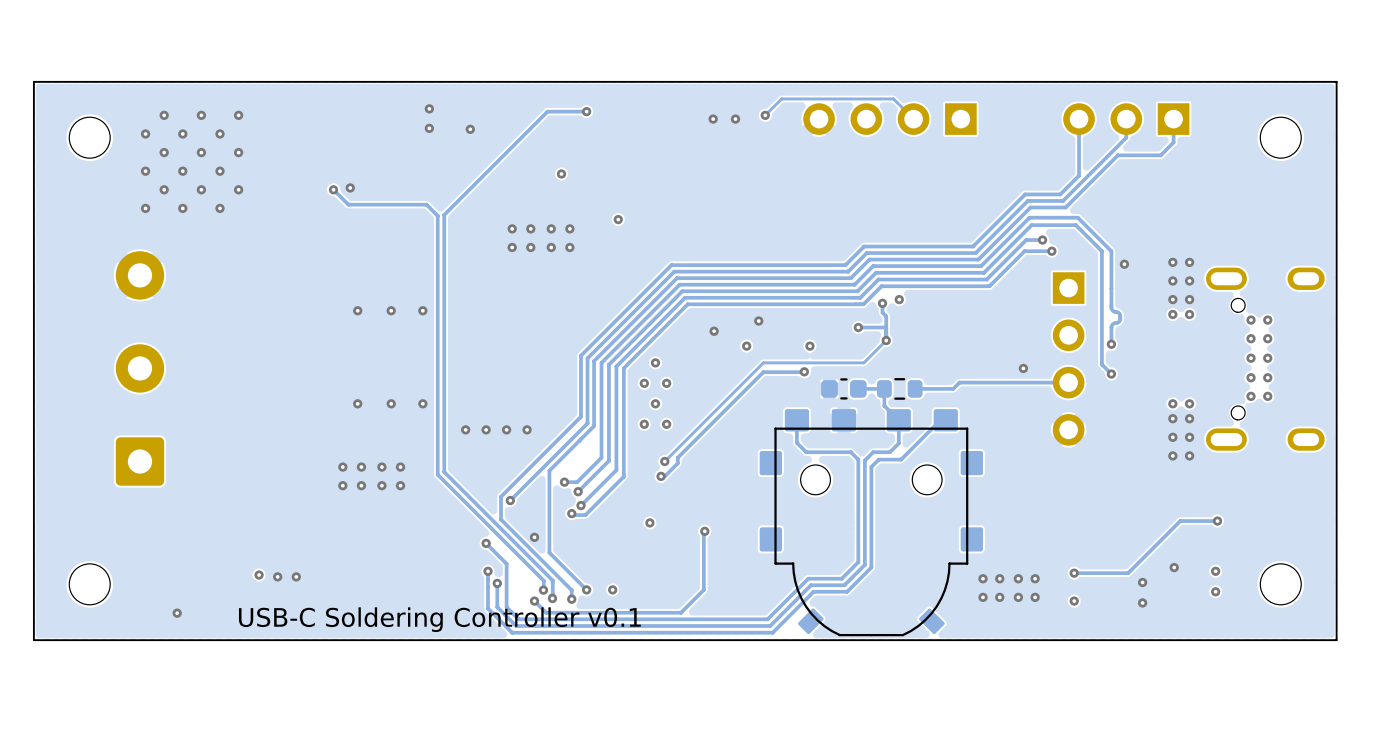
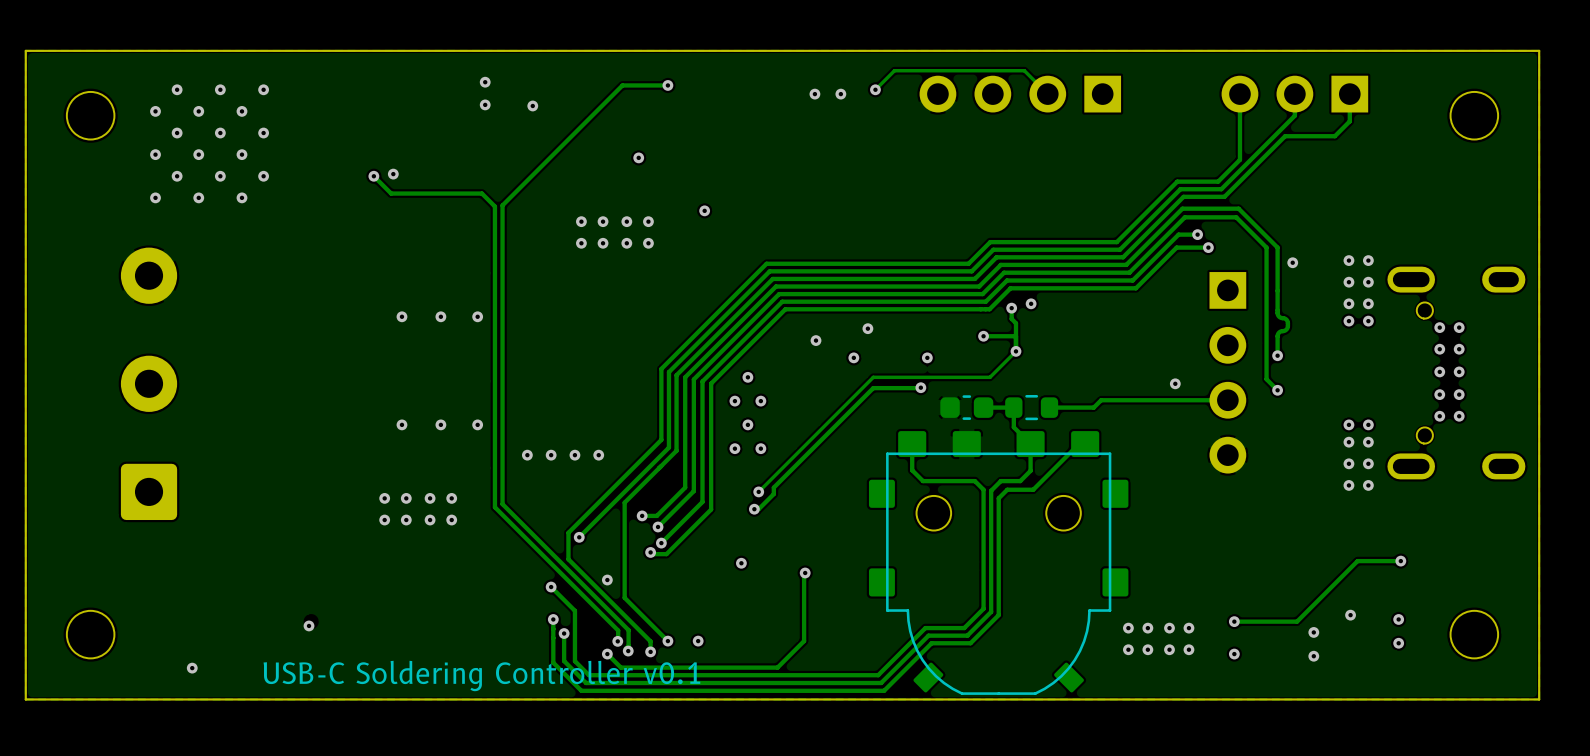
via: (259, 575) -> none
via: (296, 576) -> none

